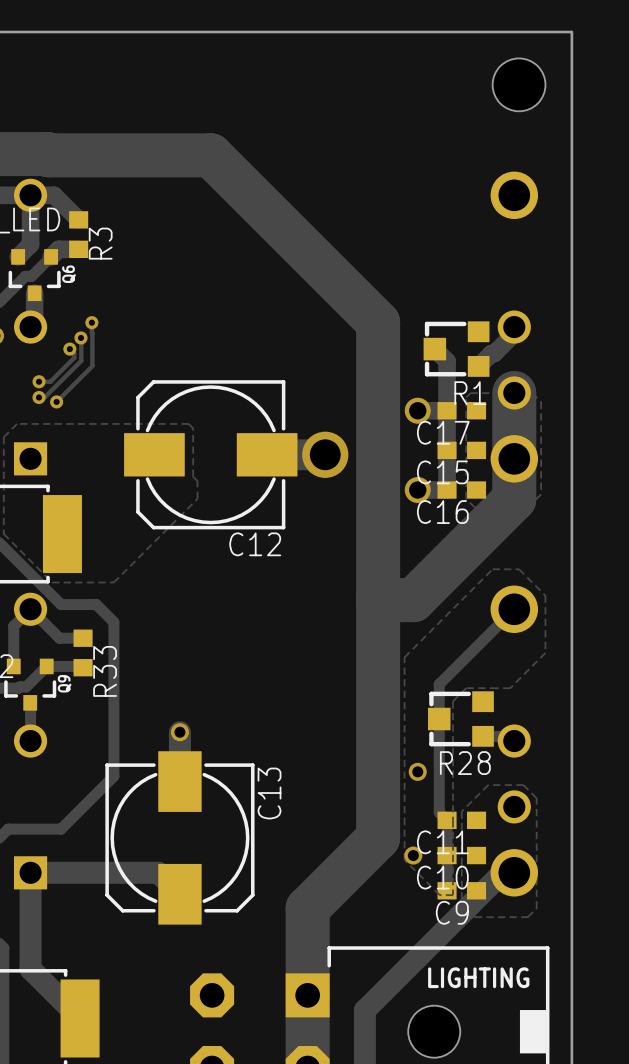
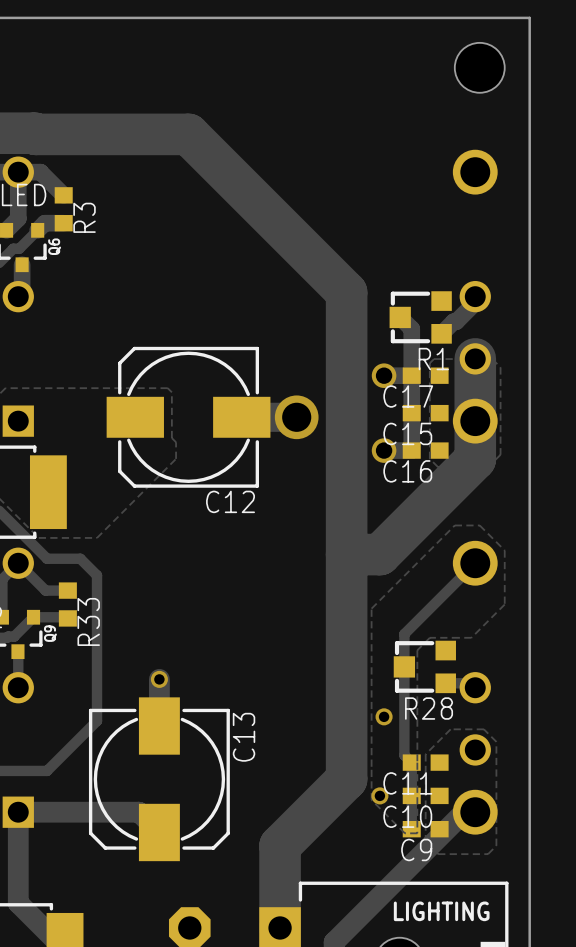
track: (91, 322) (92, 366) (56, 401) -> none
via: (91, 322) -> none
track: (80, 337) (81, 360) (44, 397) (39, 397) -> none
via: (80, 337) -> none
track: (69, 349) (74, 353) (74, 357) (50, 381) (39, 381) -> none
via: (69, 349) -> none
via: (39, 381) -> none
via: (39, 397) -> none
via: (56, 401) -> none

